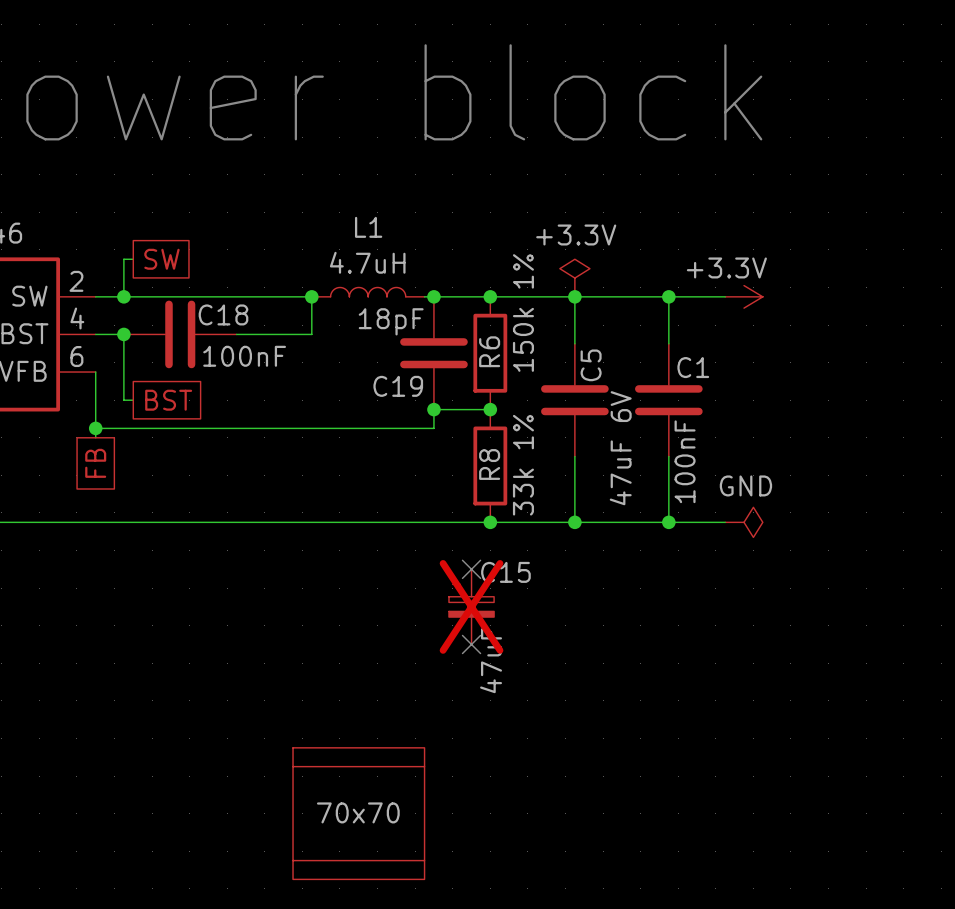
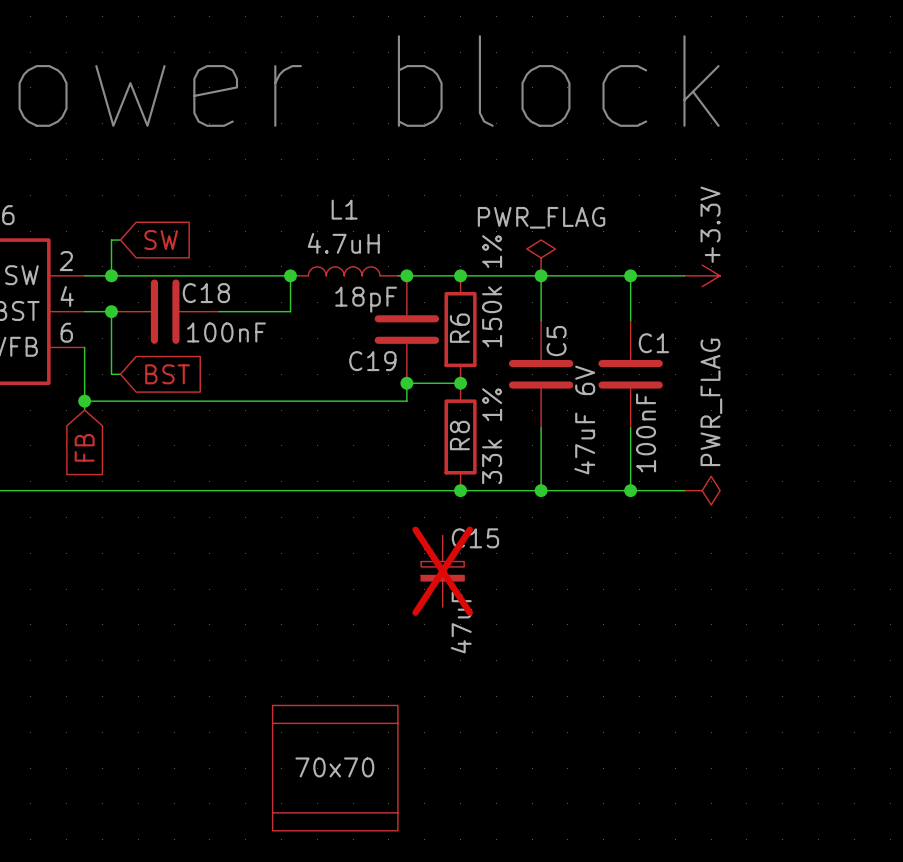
global label shape: passive (161, 259) -> input (161, 240)
power symbol text rotation: 0° (726, 267) -> 90° counterclockwise (710, 224)
power symbol: +3.3V (574, 278) -> PWR_FLAG (541, 257)
global label shape: passive (168, 400) -> input (167, 374)
global label shape: passive (95, 463) -> input (84, 447)
power symbol: GND (744, 522) -> PWR_FLAG (702, 490)
no-connect mark: (471, 569) -> none
no-connect mark: (471, 644) -> none

